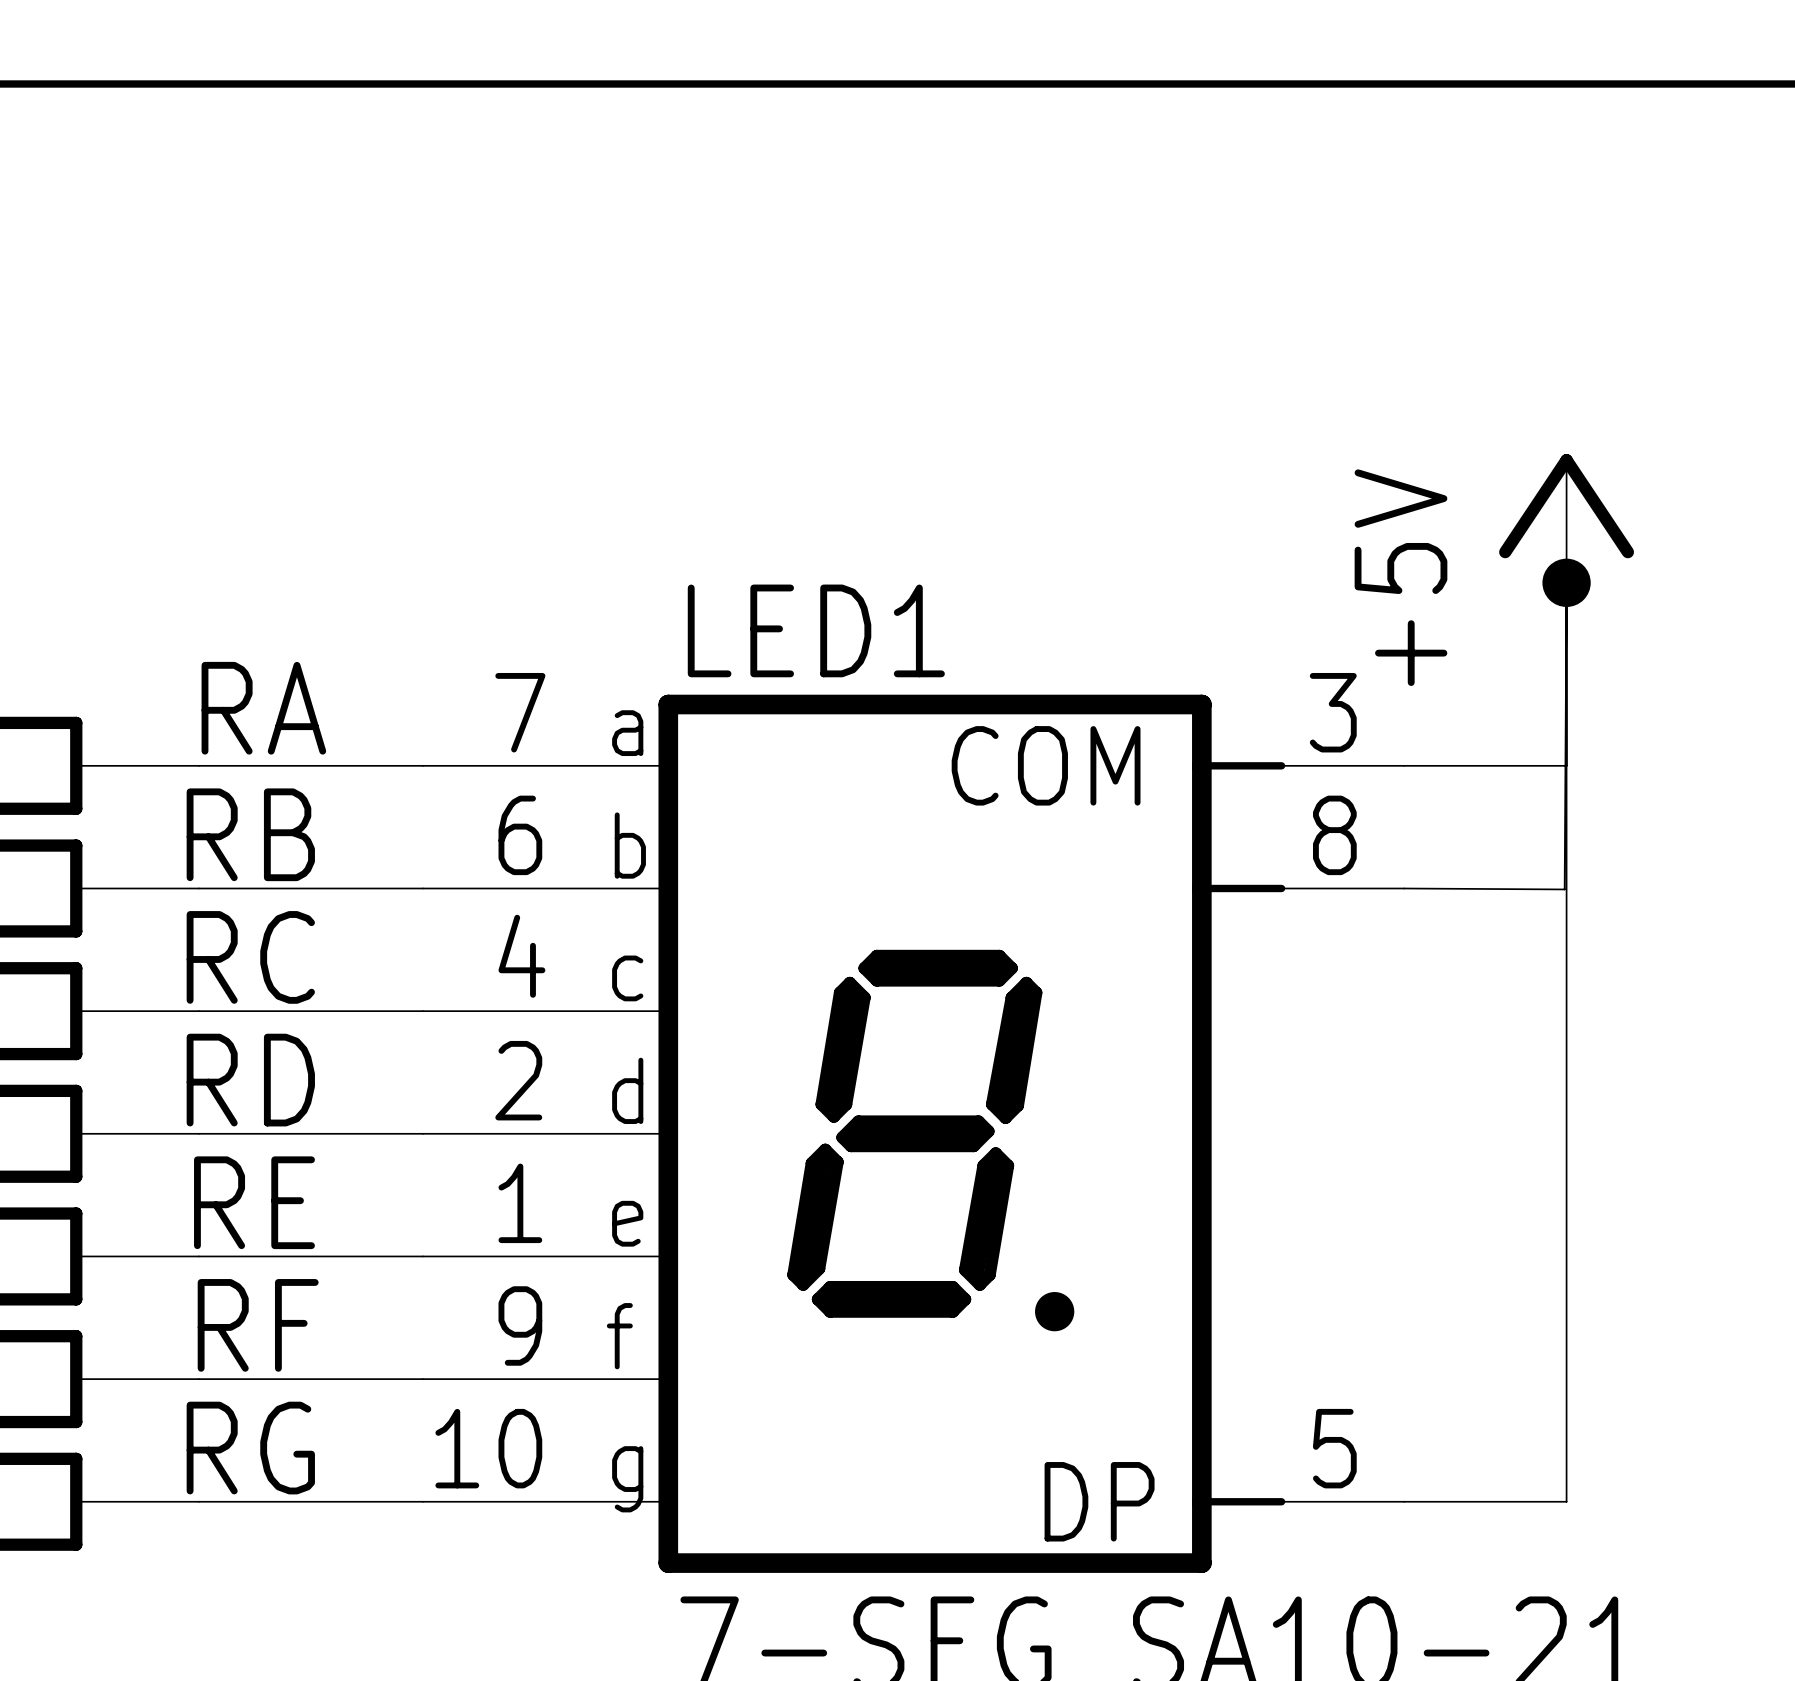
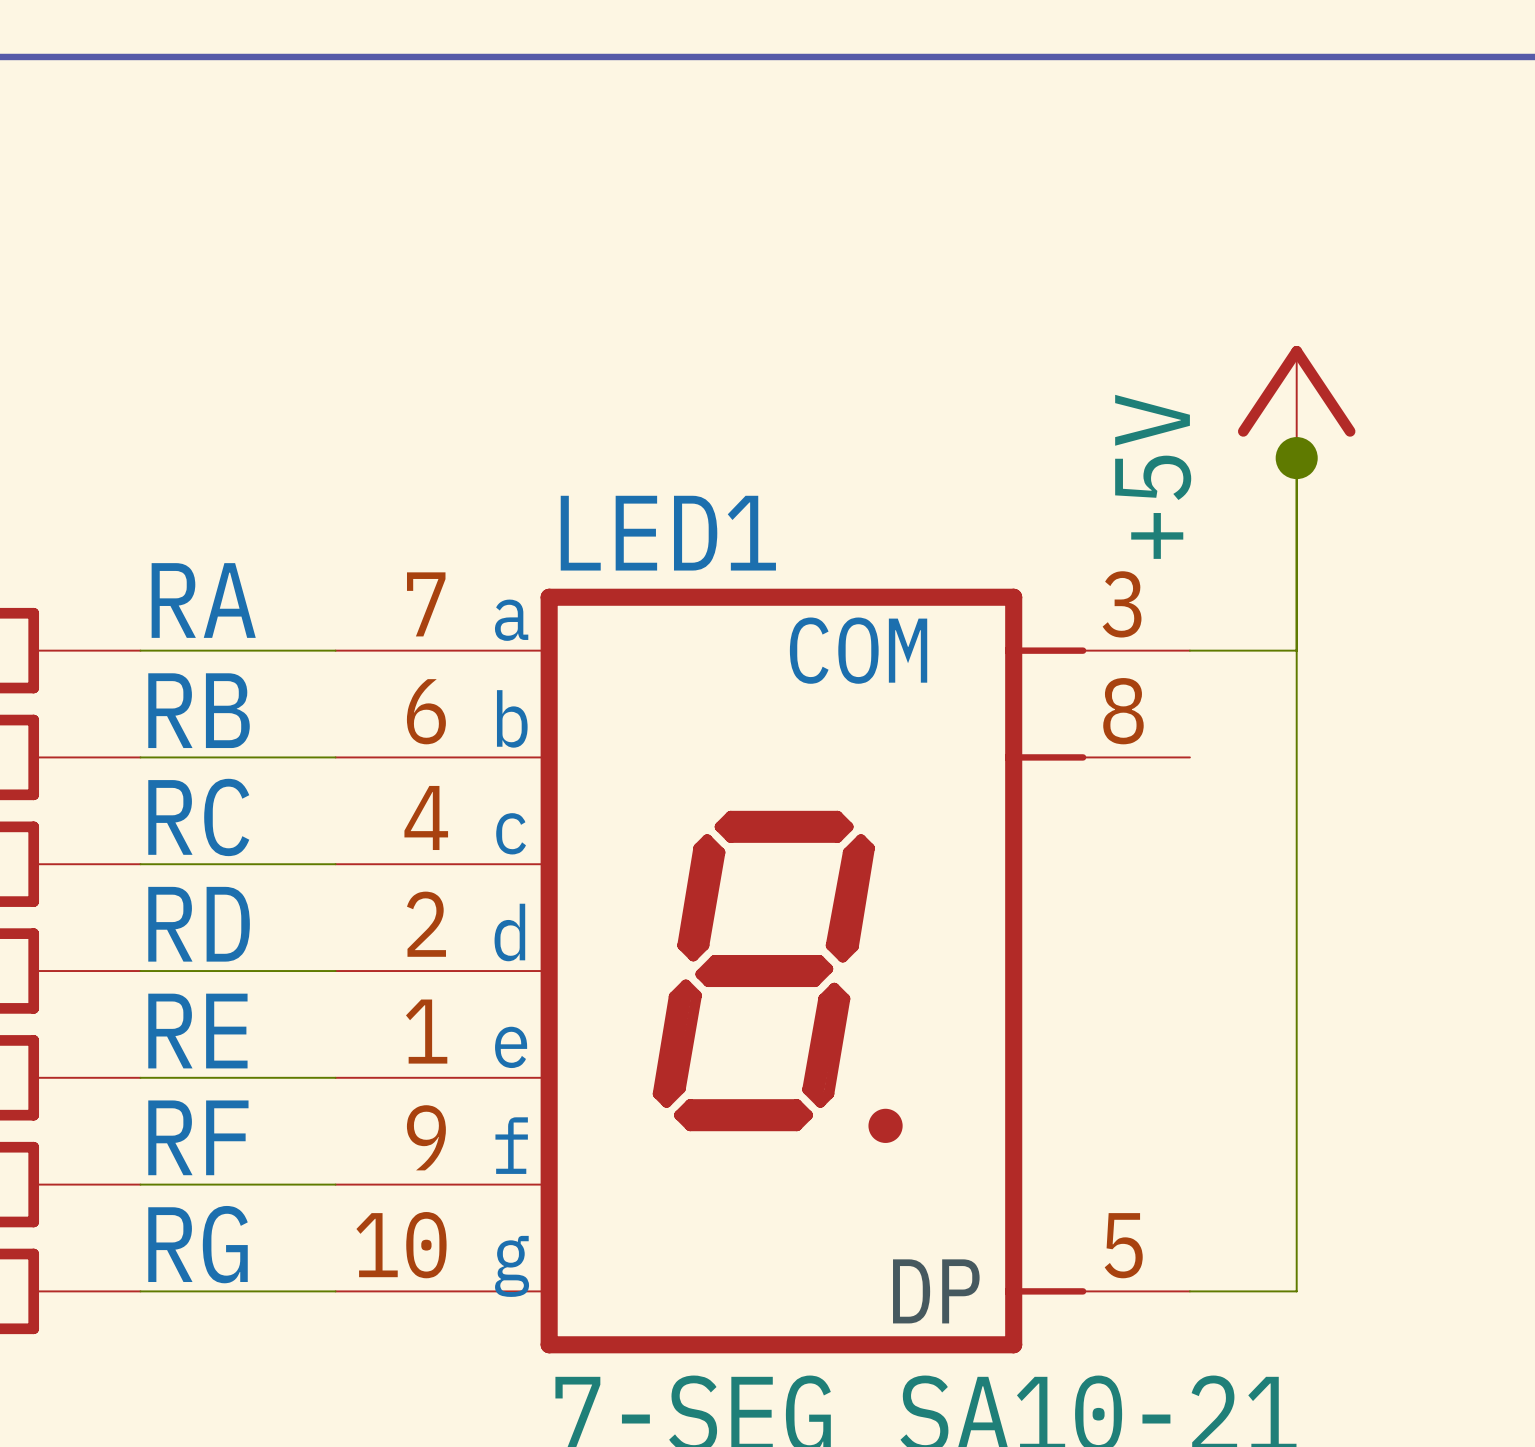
power symbol position: +5V (1566, 518) -> +5V (1296, 402)
junction position: (1566, 582) -> (1296, 458)
wire: (1526, 765) (1566, 765) -> none
wire: (1404, 888) (1564, 889) (1566, 582) (1566, 1501) (1526, 1501) -> (1296, 458) (1296, 1291)

